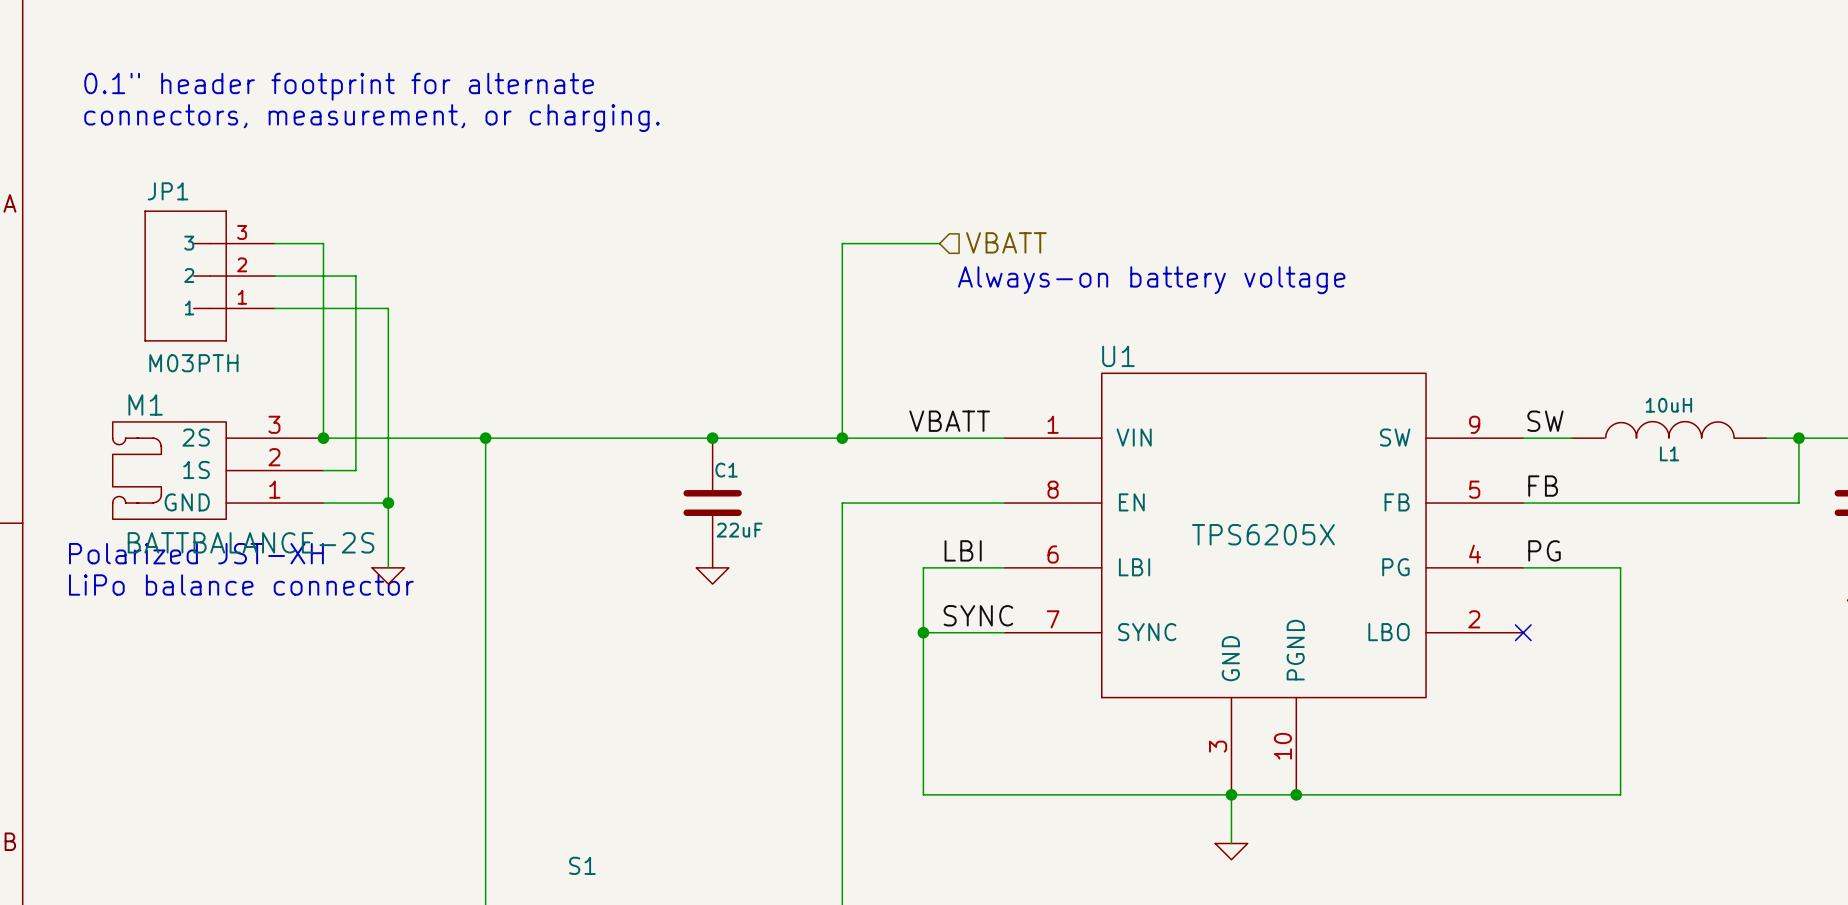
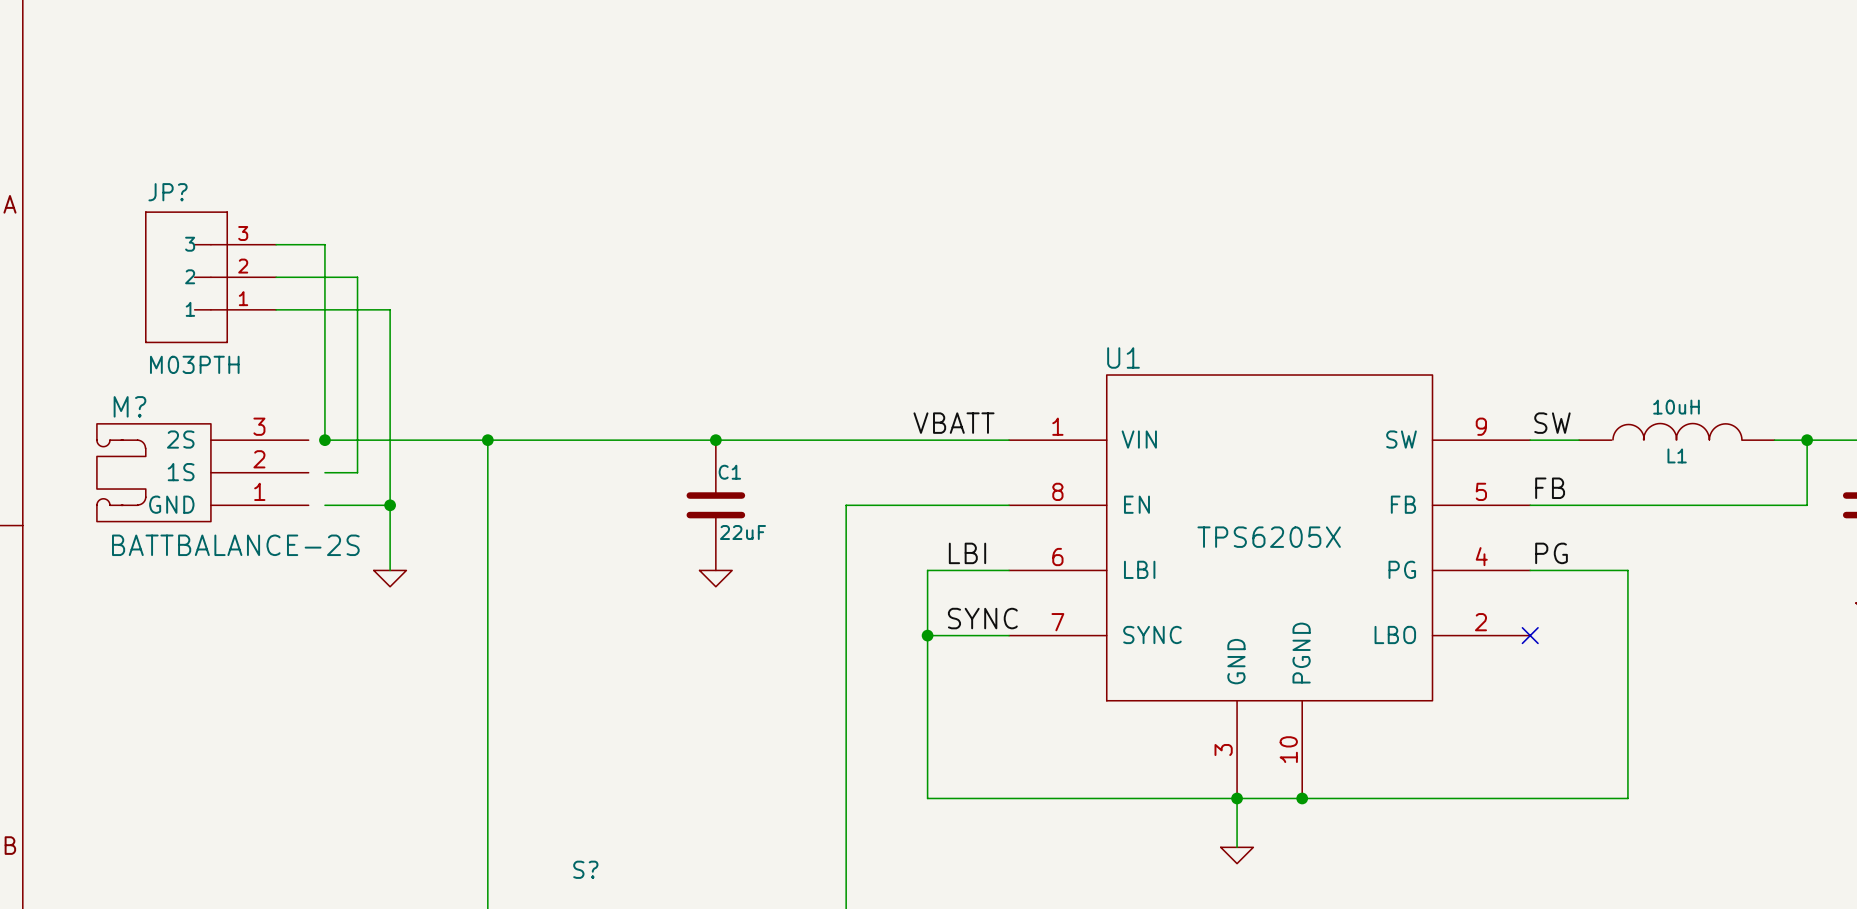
text: 0.1" header footprint for alternate (339, 86) -> none
text: connectors, measurement, or charging. (372, 118) -> none
JP1 name: JP1 (168, 191) -> JP? (168, 192)
hierarchical label: VBATT (1006, 242) -> none
wire: (939, 243) (842, 243) (842, 438) -> none
text: Always-on battery voltage (1151, 280) -> none
junction: (842, 438) -> none
M?: none -> BATTBALANCE-2S (202, 472)
M1: BATTBALANCE-2S (218, 470) -> none
text: Polarized JST-XH (196, 553) -> none
text: LiPo balance connector (241, 585) -> none
S1 name: S1 (582, 865) -> S? (585, 869)

